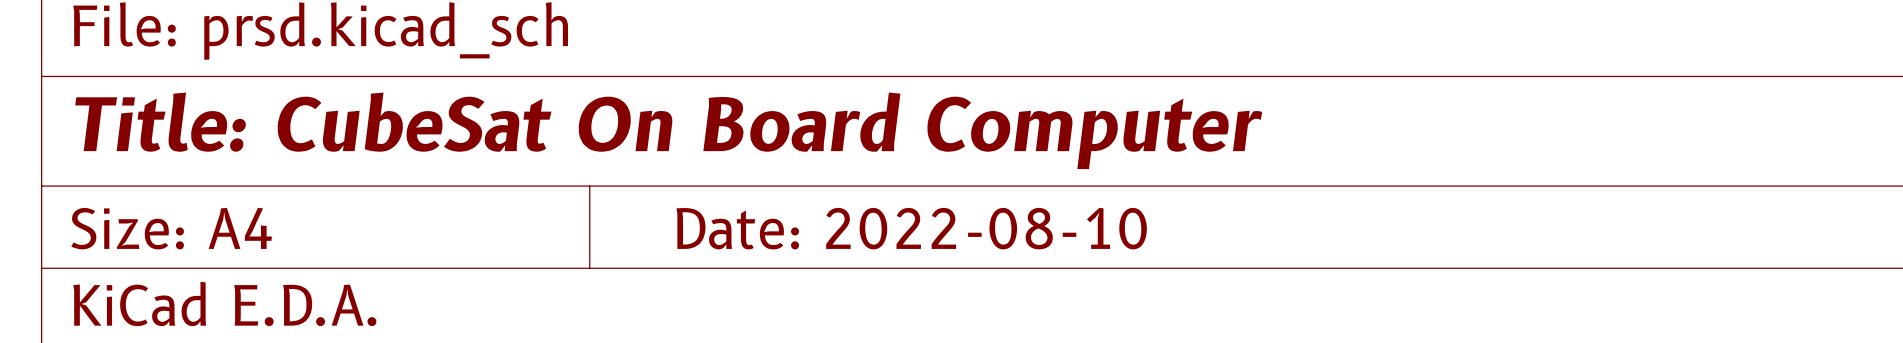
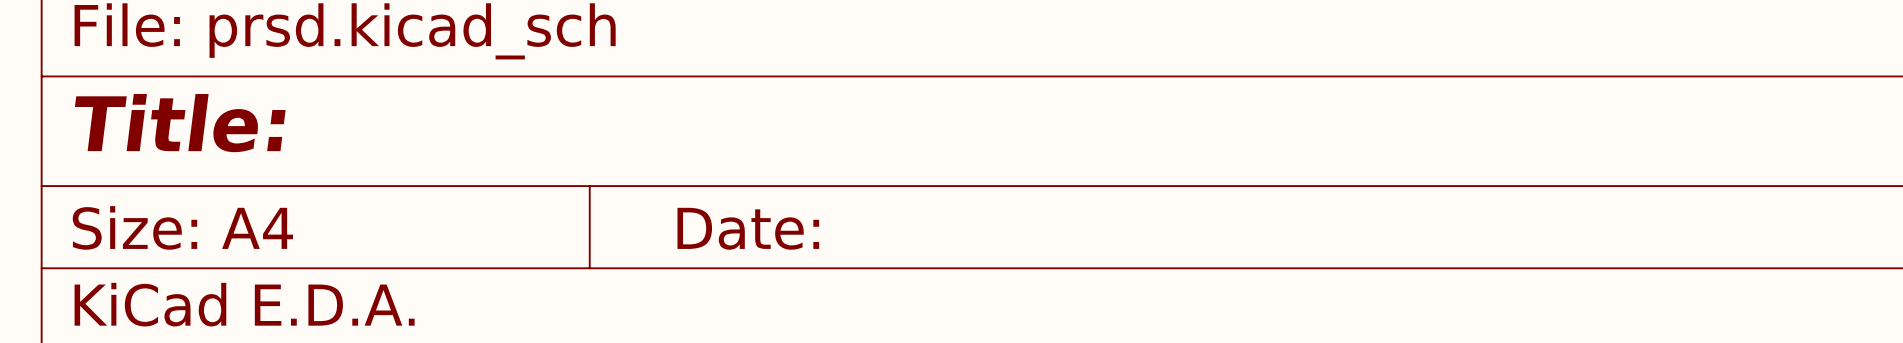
title block: Title: CubeSat On Board Computer (668, 130) -> Title: (180, 123)
title block: Date: 2022-08-10 (911, 228) -> Date: (748, 228)

